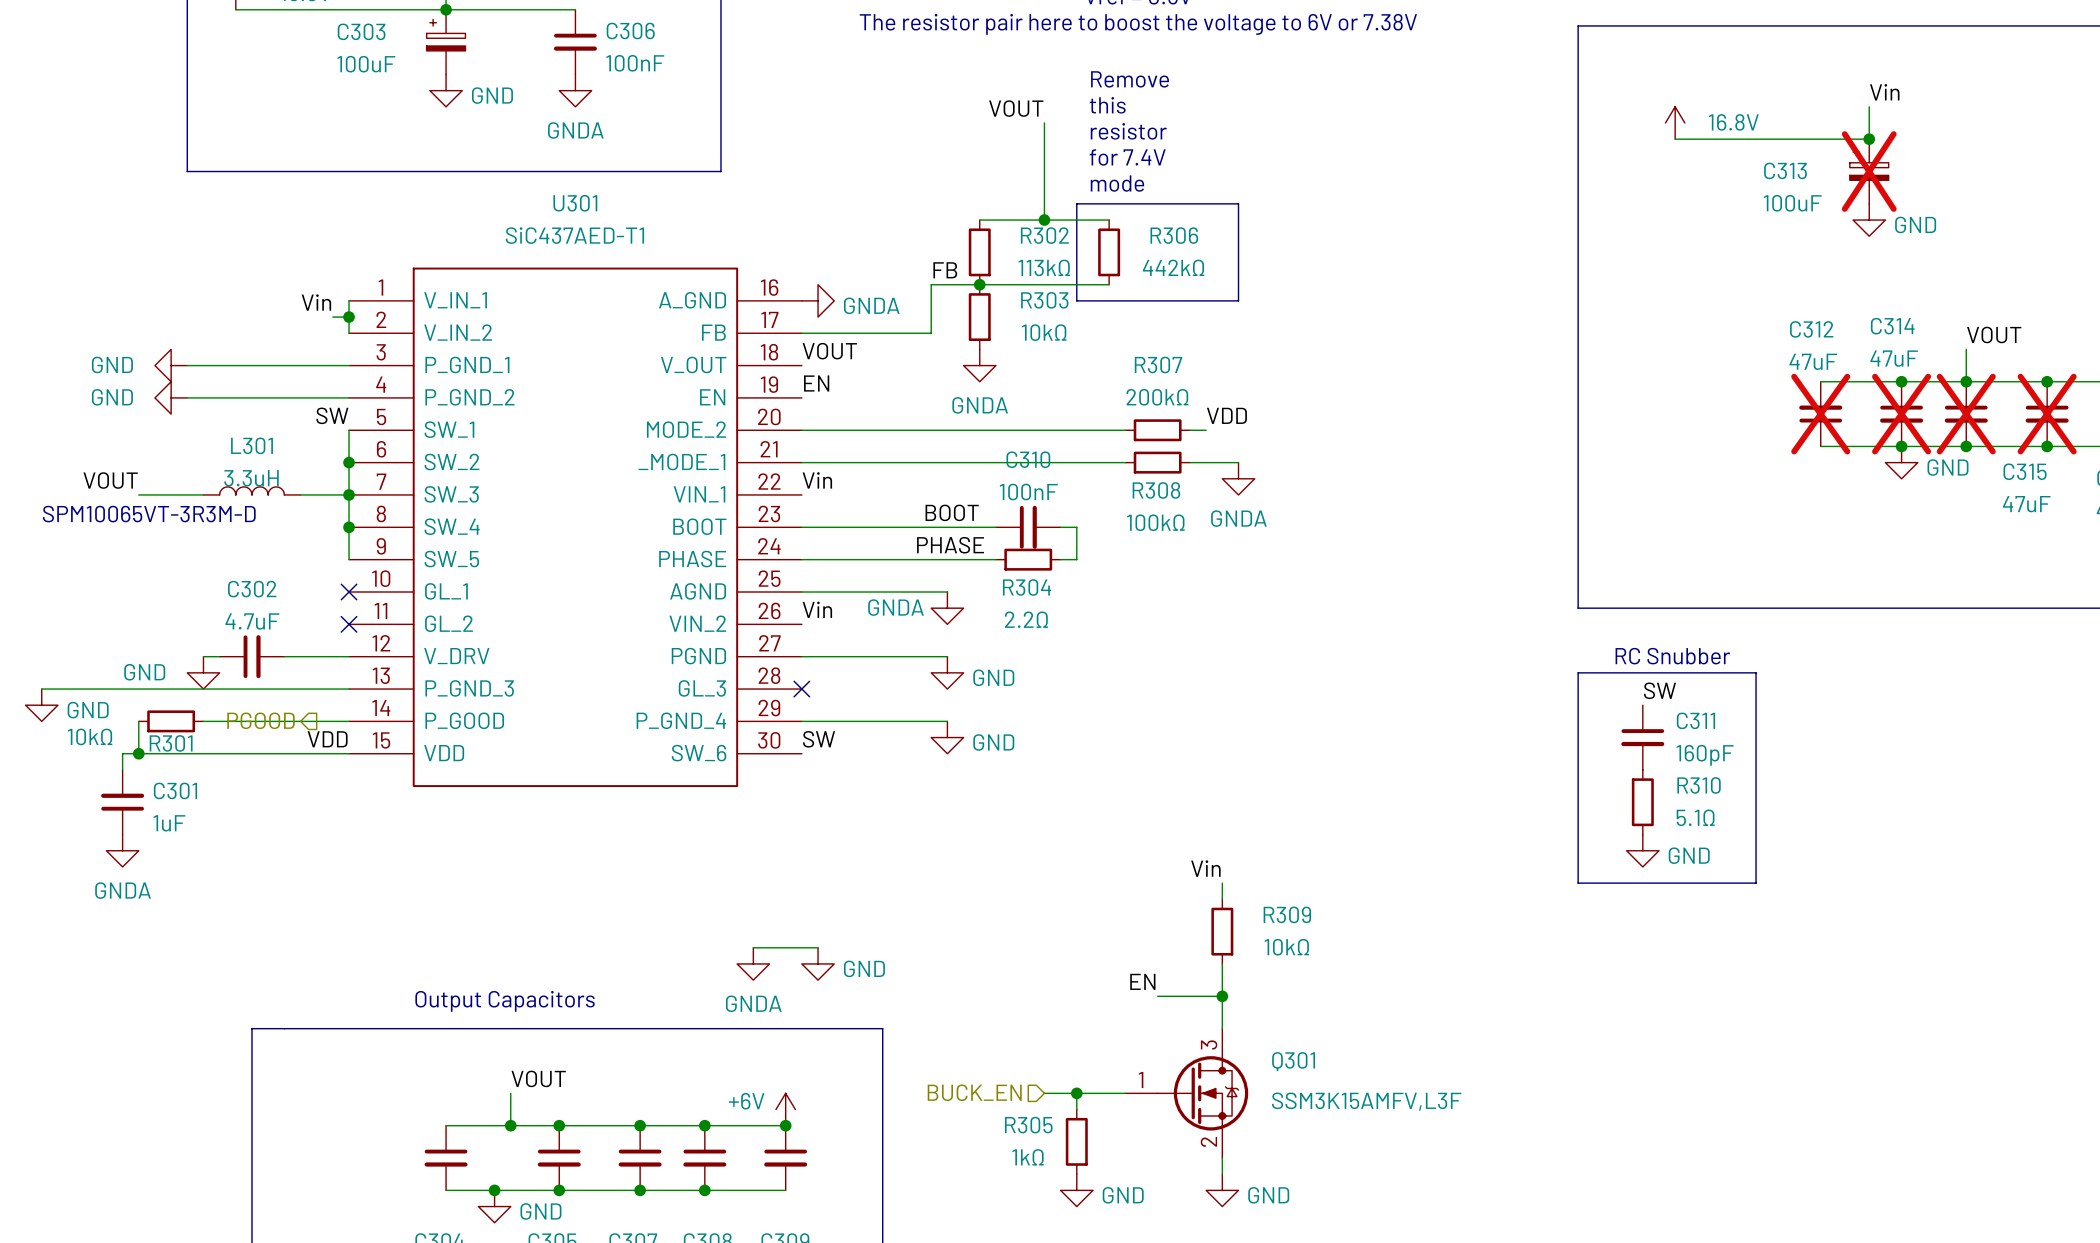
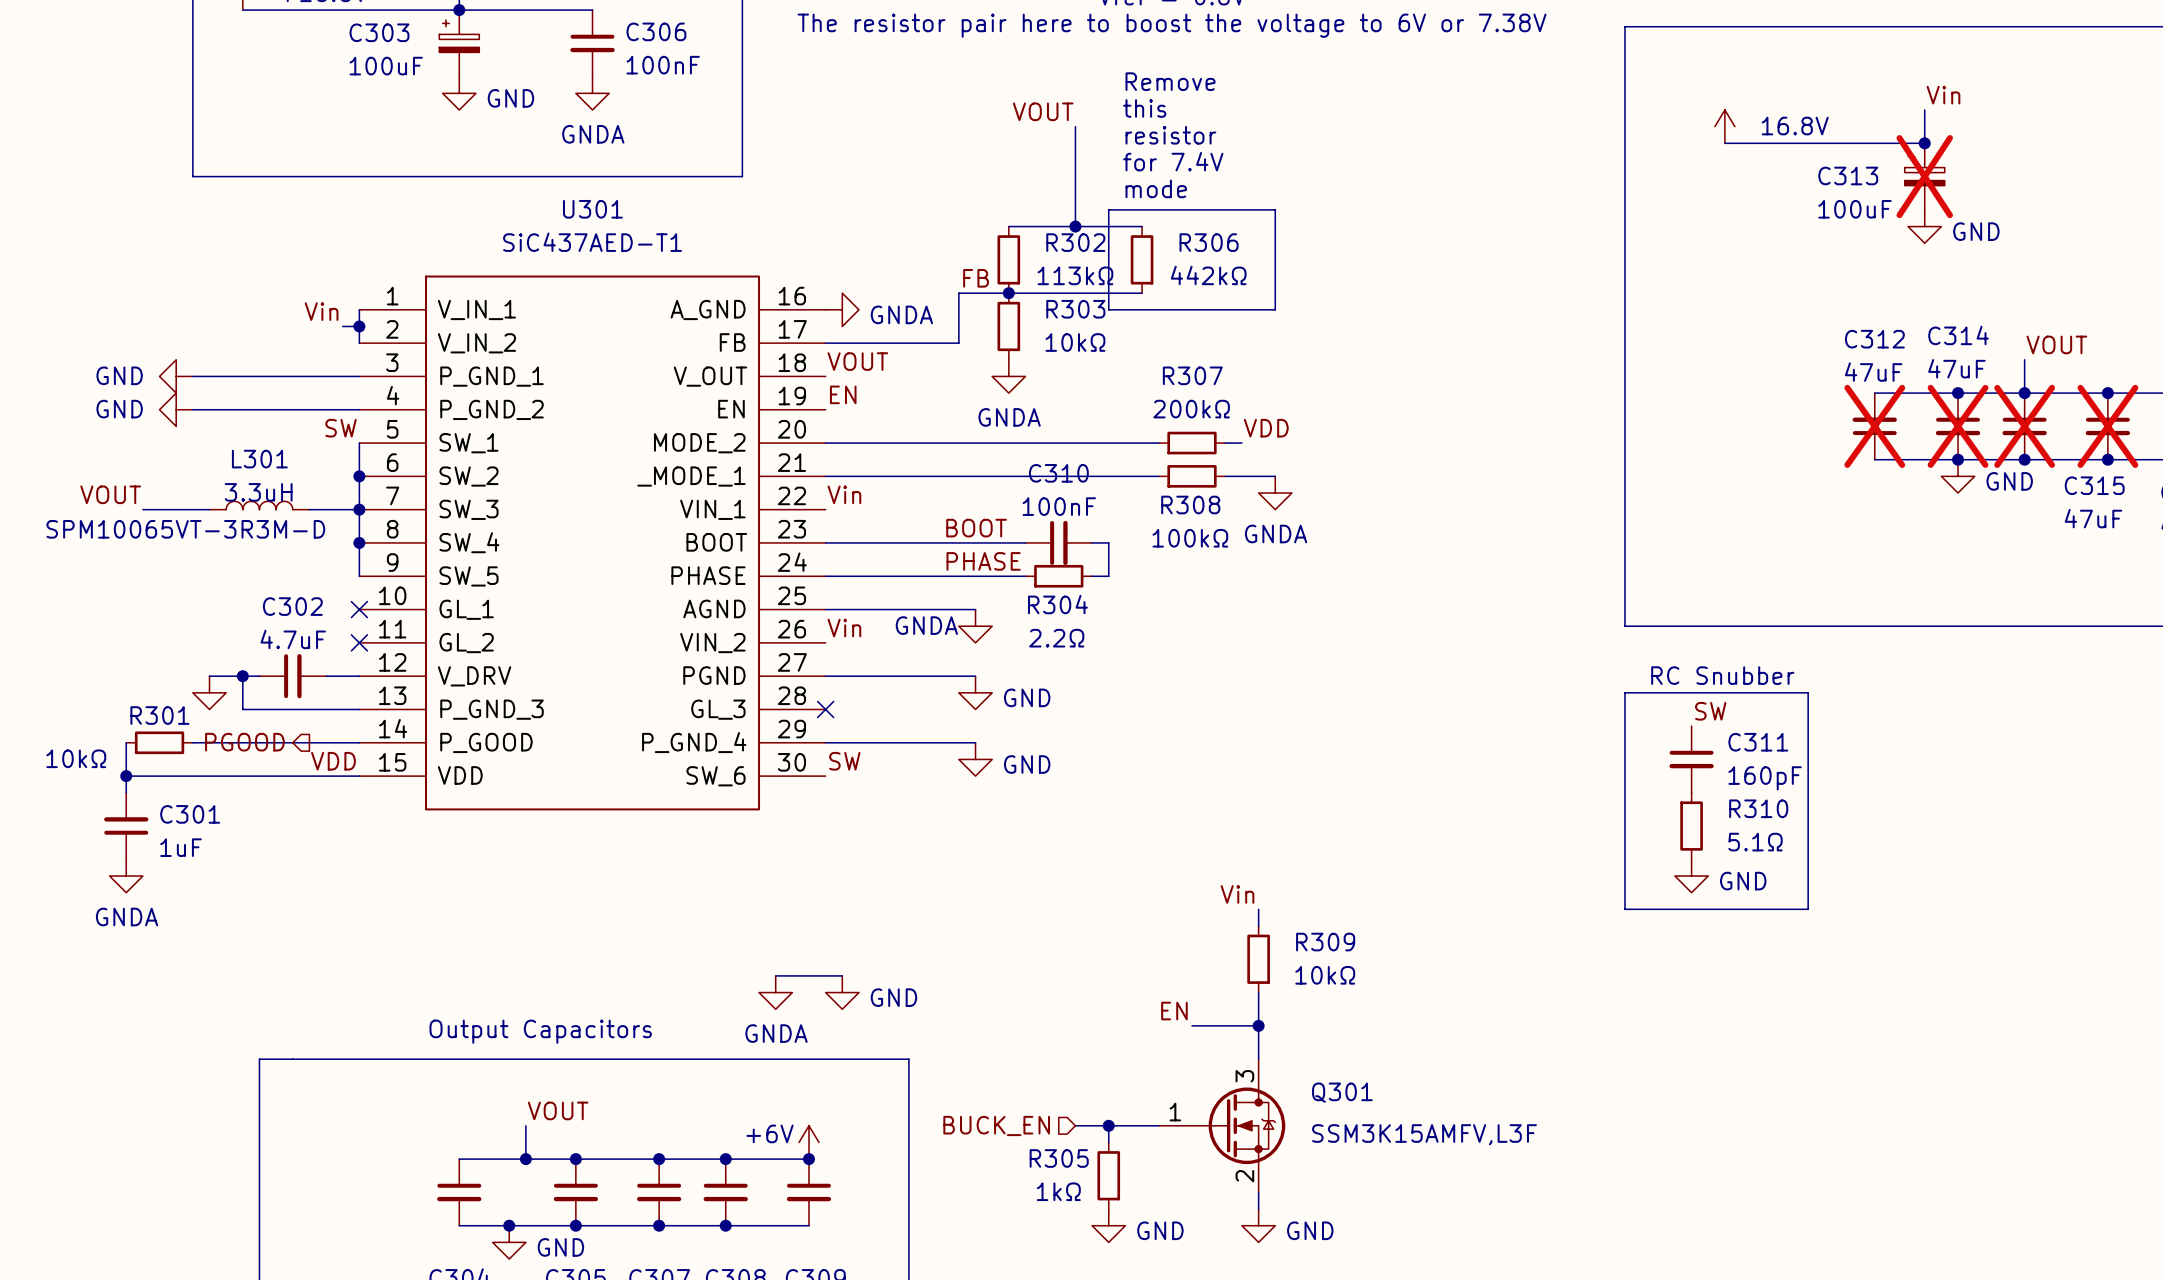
junction: none -> (242, 676)
C302 position: (251, 656) -> (292, 676)
power symbol text: GND (144, 672) -> none
wire: (41, 689) (235, 689) -> (242, 676) (242, 709)
power symbol: GND (41, 705) -> none
hierarchical label position: PGOOD (260, 720) -> PGOOD (244, 742)
wire: (138, 721) (138, 753) -> (126, 742) (126, 776)
R301 position: (171, 721) -> (159, 742)
R301 name position: R301 (171, 743) -> R301 (159, 715)
junction position: (138, 753) -> (126, 776)

